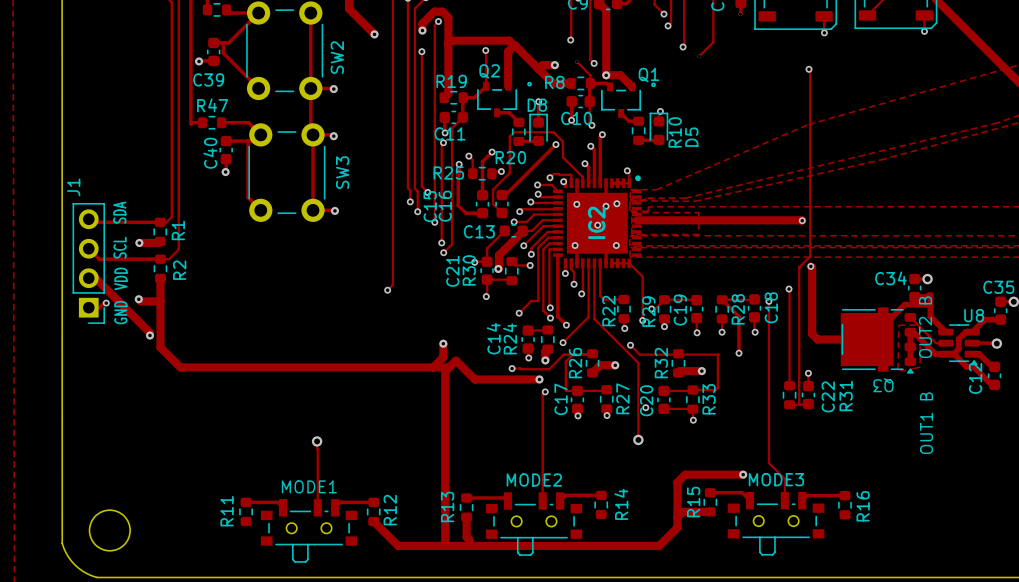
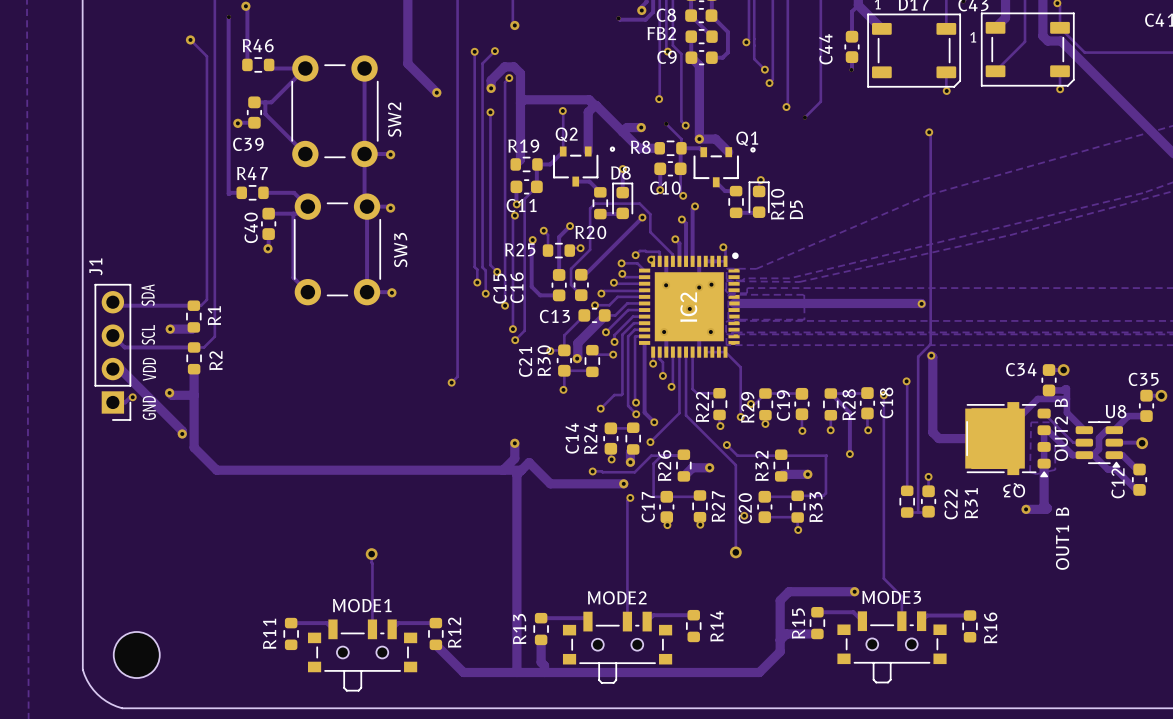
track: none -> (1044, 463) (1044, 505) (1047, 508) (1026, 509)
via: none -> (1026, 509)

